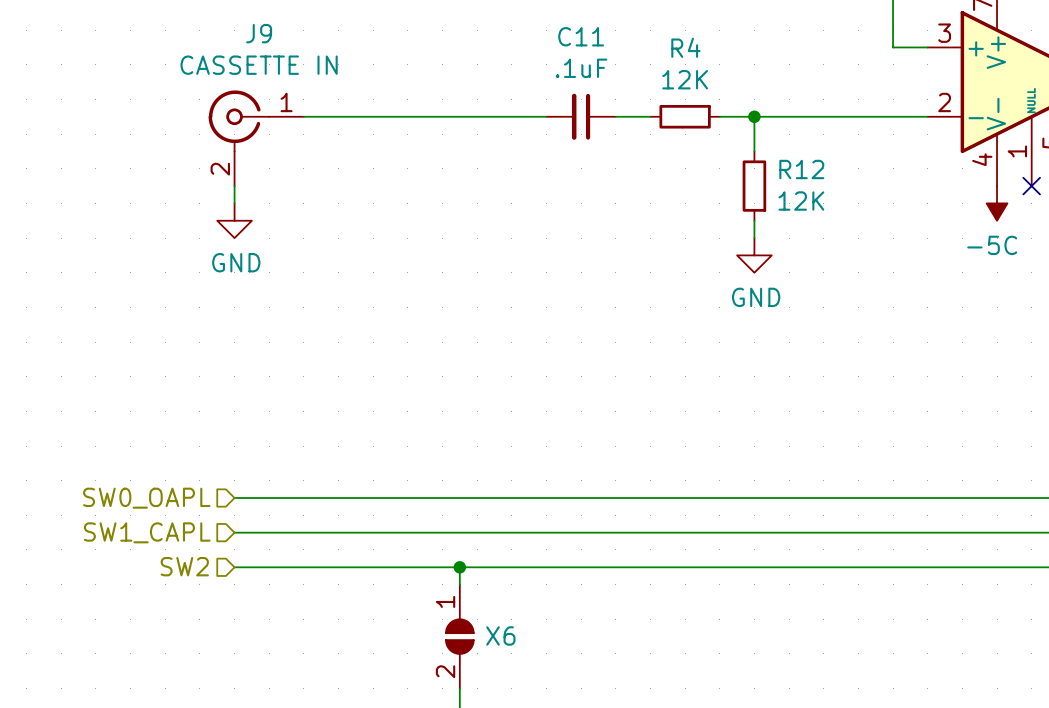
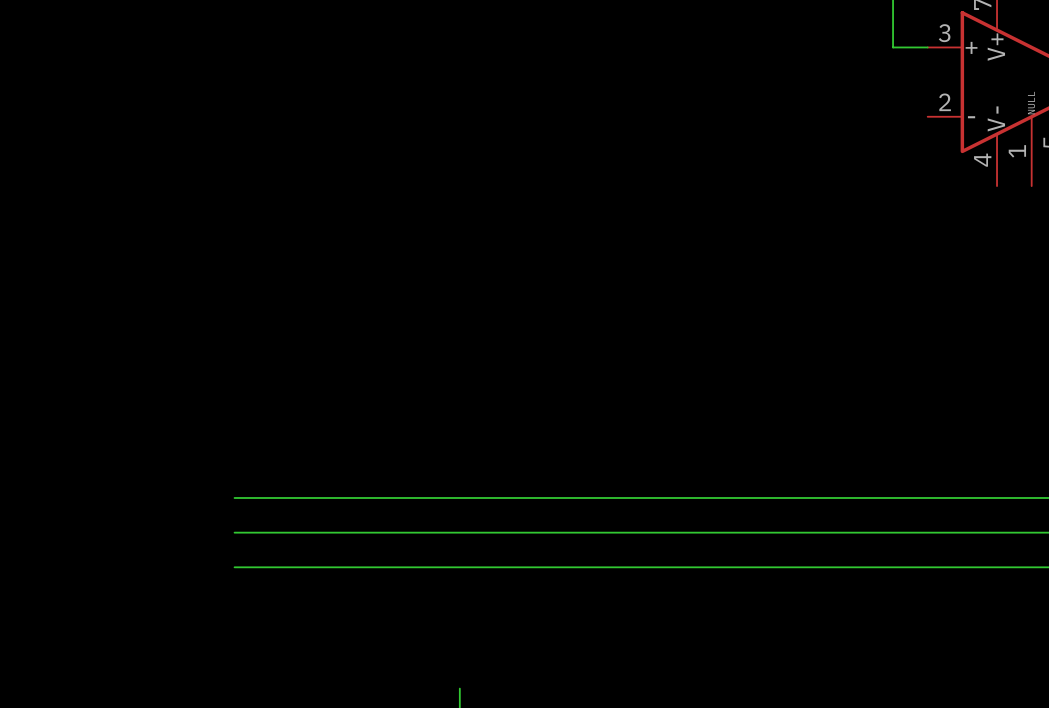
wire: (303, 116) (546, 116) -> none
C11: .1uF (581, 116) -> none
wire: (615, 116) (650, 116) -> none
R4: 12K (685, 116) -> none
wire: (719, 116) (927, 116) -> none
wire: (754, 116) (754, 151) -> none
junction: (754, 116) -> none
J9: CASSETTE IN (256, 138) -> none
wire: (234, 186) (234, 203) -> none
R12: 12K (754, 186) -> none
no-connect mark: (1031, 186) -> none
power symbol: -5C (997, 203) -> none
power symbol: GND (234, 220) -> none
wire: (754, 220) (754, 238) -> none
power symbol: GND (754, 255) -> none
hierarchical label: SW0_OAPL (146, 498) -> none
hierarchical label: SW1_CAPL (147, 532) -> none
hierarchical label: SW2 (184, 566) -> none
wire: (459, 567) (459, 584) -> none
junction: (459, 567) -> none
X6: (459, 636) -> none

